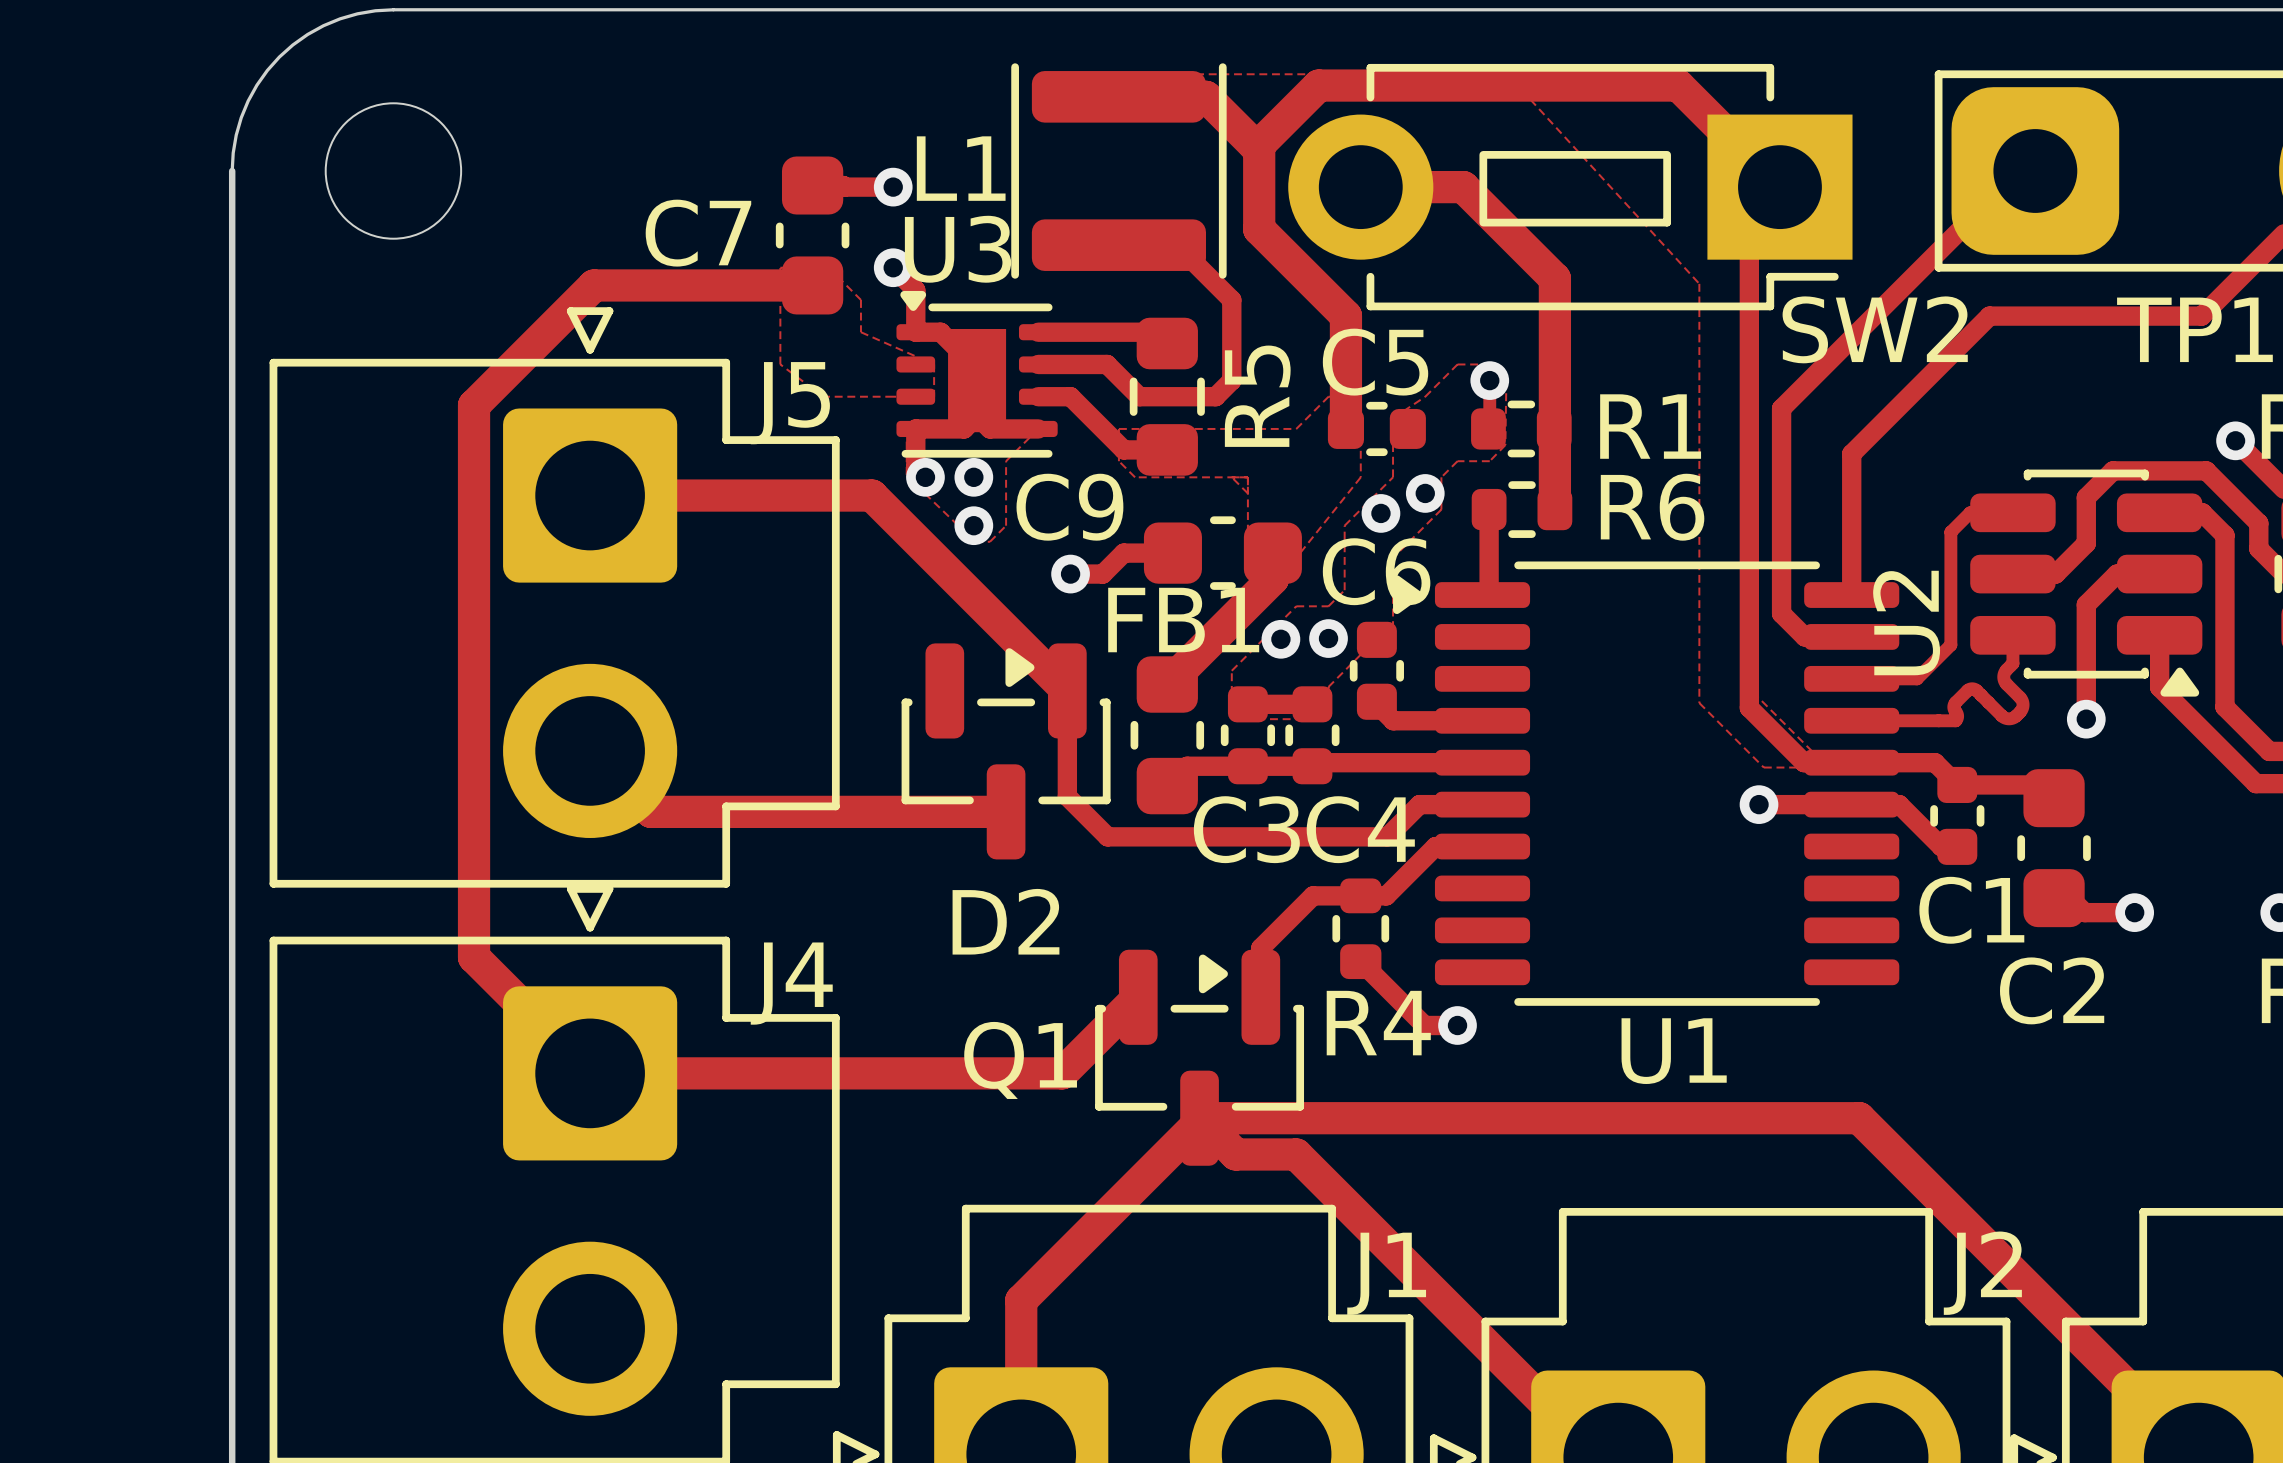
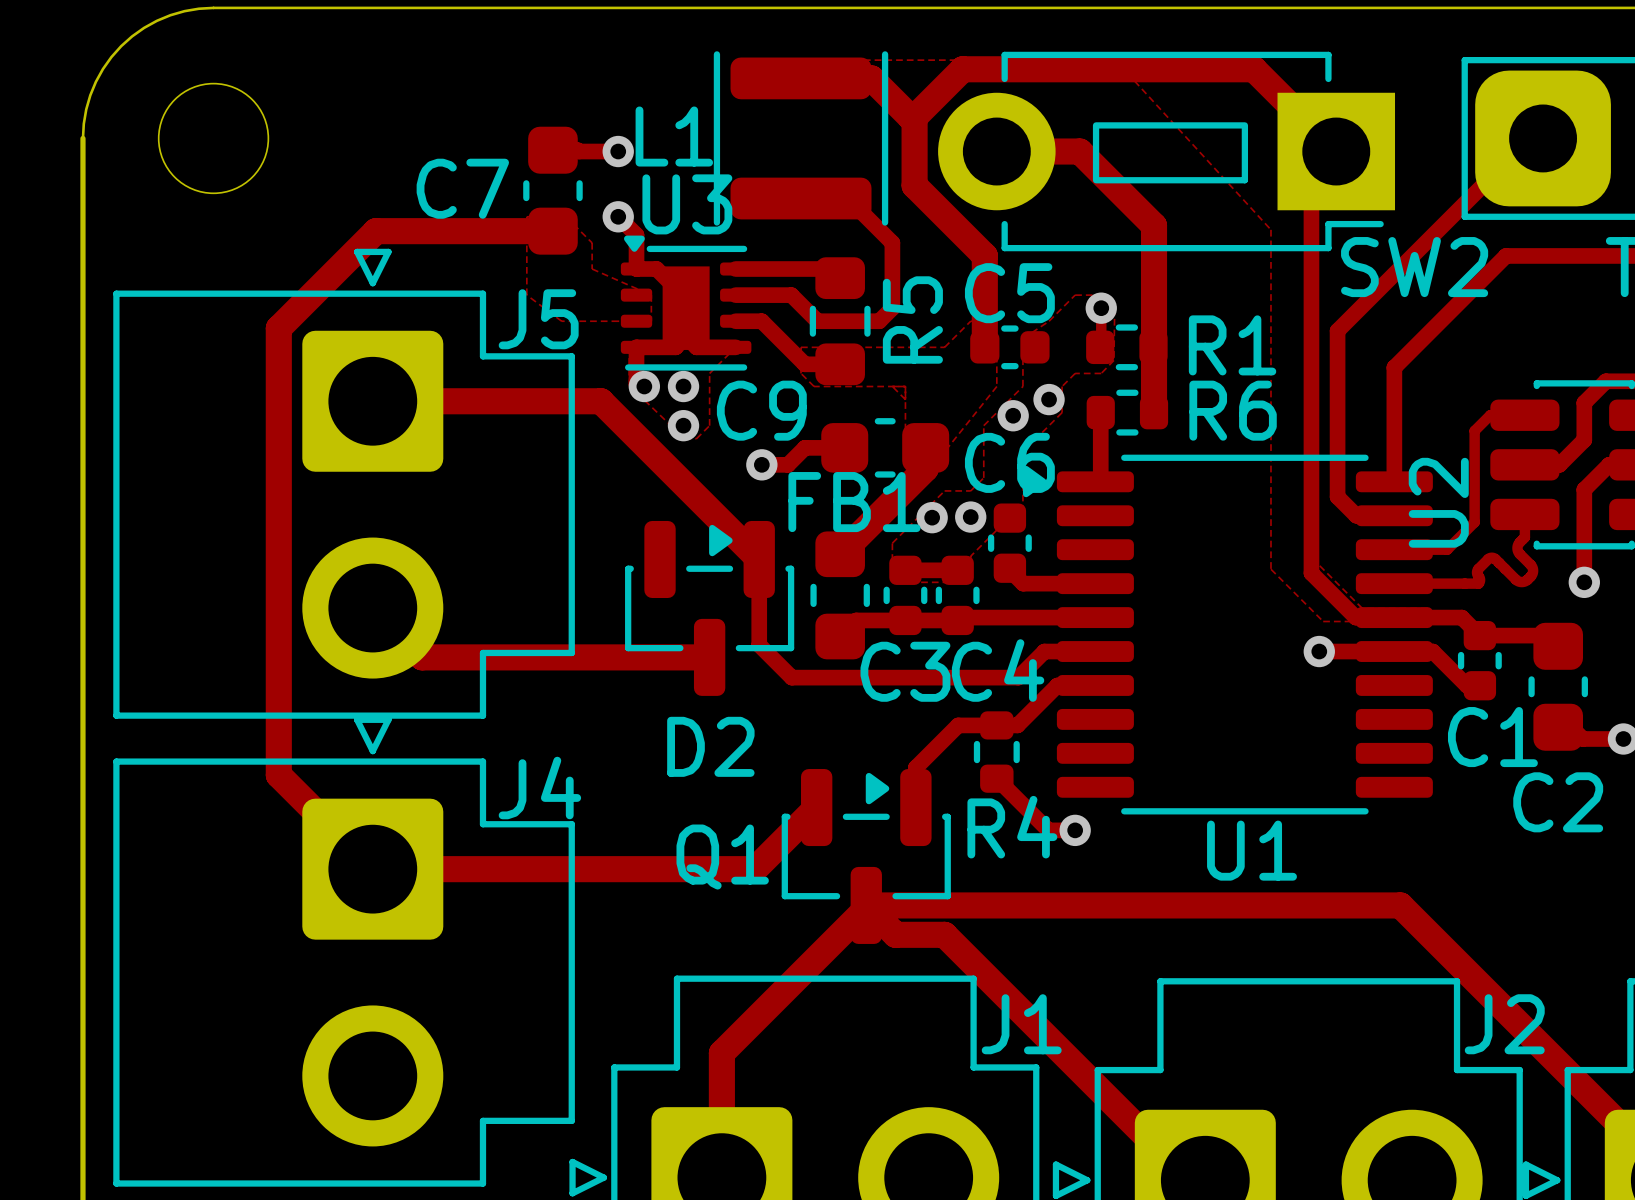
U3 name position: U3 (958, 249) -> U3 (687, 204)

